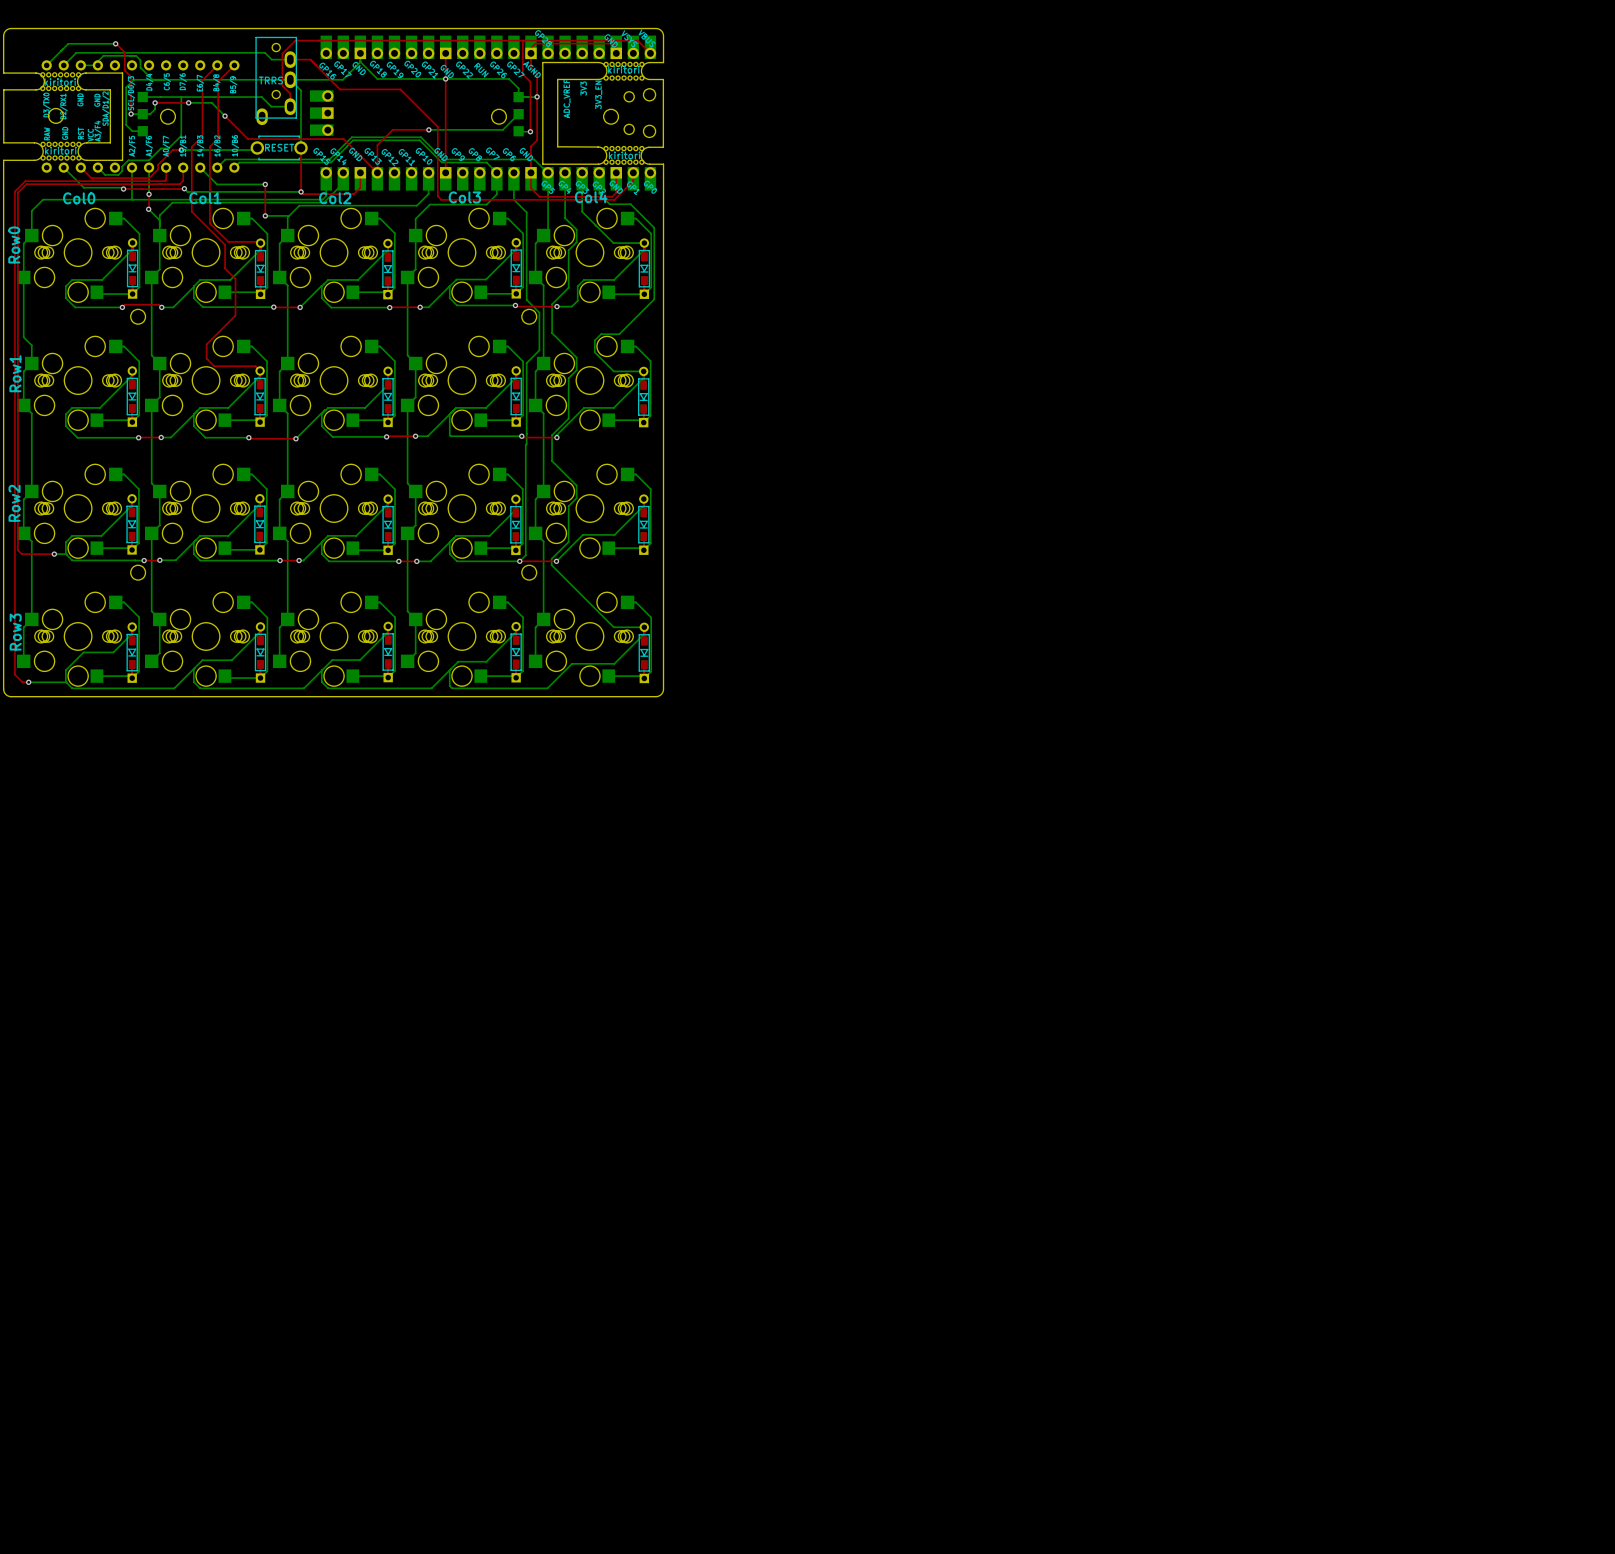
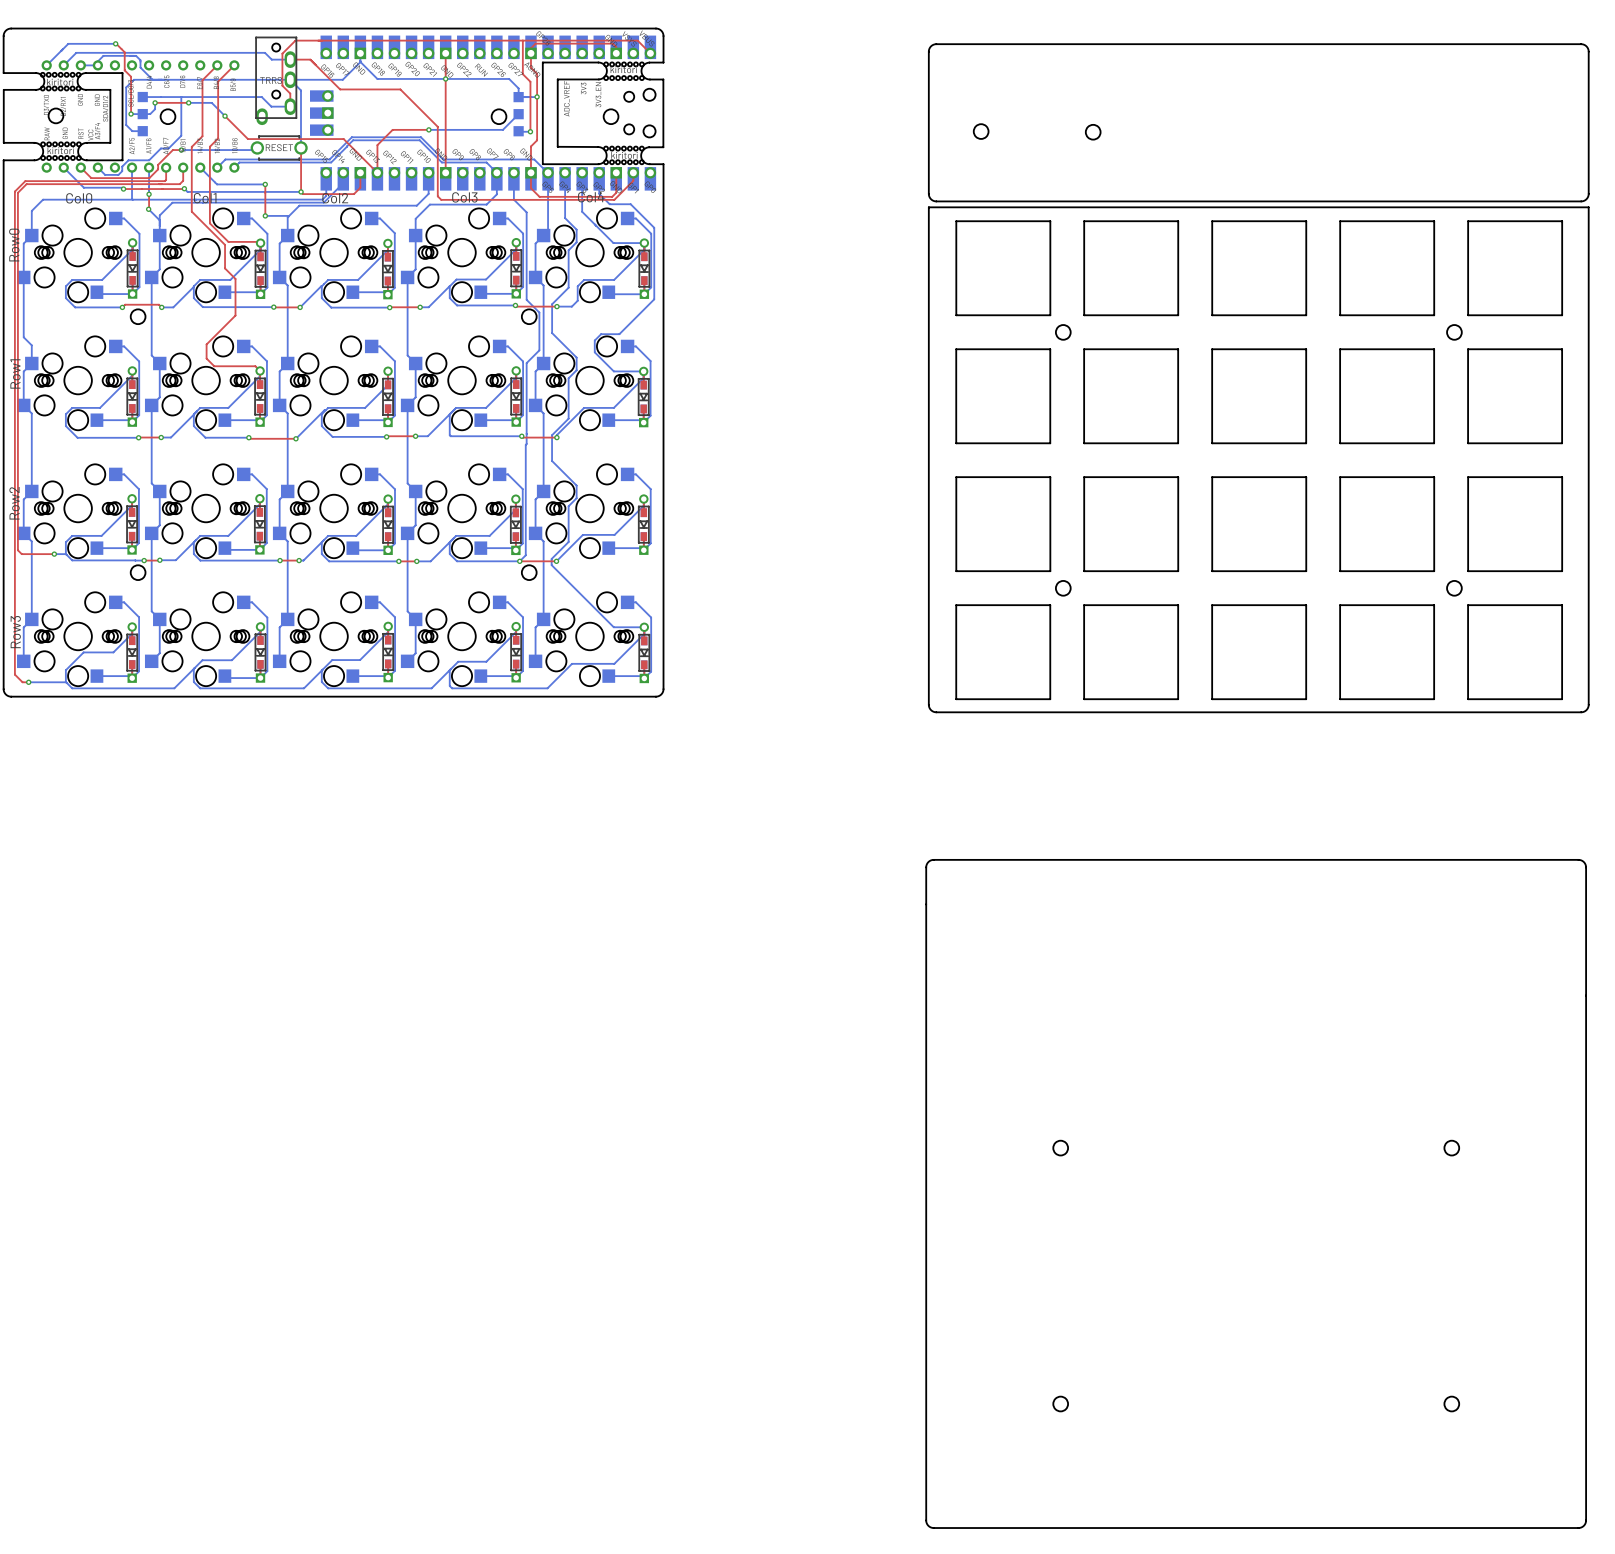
board edge: none -> (936, 44) (1583, 44) (1587, 47) (1588, 51) (1588, 195) (1585, 199) (1581, 201) (934, 201) (930, 198) (928, 193) (928, 51) (931, 46) (936, 44)
round board edge: none -> [973, 123, 990, 140]
round board edge: none -> [1085, 124, 1102, 141]
board edge: none -> (928, 207) (928, 704) (931, 710) (936, 712) (1581, 712) (1587, 709) (1588, 704) (1588, 207) (928, 207)
board edge: none -> (956, 221) (956, 315) (1050, 315) (1050, 221) (956, 221)
board edge: none -> (1084, 221) (1084, 315) (1178, 315) (1178, 221) (1084, 221)
board edge: none -> (1212, 221) (1306, 221) (1306, 315) (1212, 315) (1212, 221)
board edge: none -> (1340, 221) (1434, 221) (1434, 315) (1340, 315) (1340, 221)
board edge: none -> (1468, 221) (1562, 221) (1562, 315) (1468, 315) (1468, 221)
round board edge: none -> [1055, 324, 1072, 341]
round board edge: none -> [1446, 324, 1463, 341]
board edge: none -> (956, 349) (956, 443) (1050, 443) (1050, 349) (956, 349)
board edge: none -> (1084, 349) (1084, 443) (1178, 443) (1178, 349) (1084, 349)
board edge: none -> (1212, 349) (1212, 443) (1306, 443) (1306, 349) (1212, 349)
board edge: none -> (1340, 349) (1340, 443) (1434, 443) (1434, 349) (1340, 349)
board edge: none -> (1468, 349) (1468, 443) (1562, 443) (1562, 349) (1468, 349)
board edge: none -> (956, 477) (1050, 477) (1050, 571) (956, 571) (956, 477)
board edge: none -> (1084, 477) (1178, 477) (1178, 571) (1084, 571) (1084, 477)
board edge: none -> (1212, 477) (1306, 477) (1306, 571) (1212, 571) (1212, 477)
board edge: none -> (1340, 477) (1434, 477) (1434, 571) (1340, 571) (1340, 477)
board edge: none -> (1468, 477) (1562, 477) (1562, 571) (1468, 571) (1468, 477)
round board edge: none -> [1055, 580, 1072, 597]
round board edge: none -> [1446, 580, 1463, 597]
board edge: none -> (956, 605) (956, 699) (1050, 699) (1050, 605) (956, 605)
board edge: none -> (1084, 605) (1084, 699) (1178, 699) (1178, 605) (1084, 605)
board edge: none -> (1212, 605) (1212, 699) (1306, 699) (1306, 605) (1212, 605)
board edge: none -> (1340, 605) (1340, 699) (1434, 699) (1434, 605) (1340, 605)
board edge: none -> (1468, 605) (1468, 699) (1562, 699) (1562, 605) (1468, 605)
board edge: none -> (933, 859) (1578, 859) (1583, 862) (1586, 867) (1586, 1520) (1583, 1525) (1578, 1528) (933, 1528) (928, 1525) (926, 1520) (926, 867) (928, 862) (933, 859)
round board edge: none -> [1052, 1140, 1069, 1156]
round board edge: none -> [1443, 1140, 1460, 1156]
round board edge: none -> [1052, 1396, 1069, 1412]
round board edge: none -> [1443, 1396, 1460, 1412]

